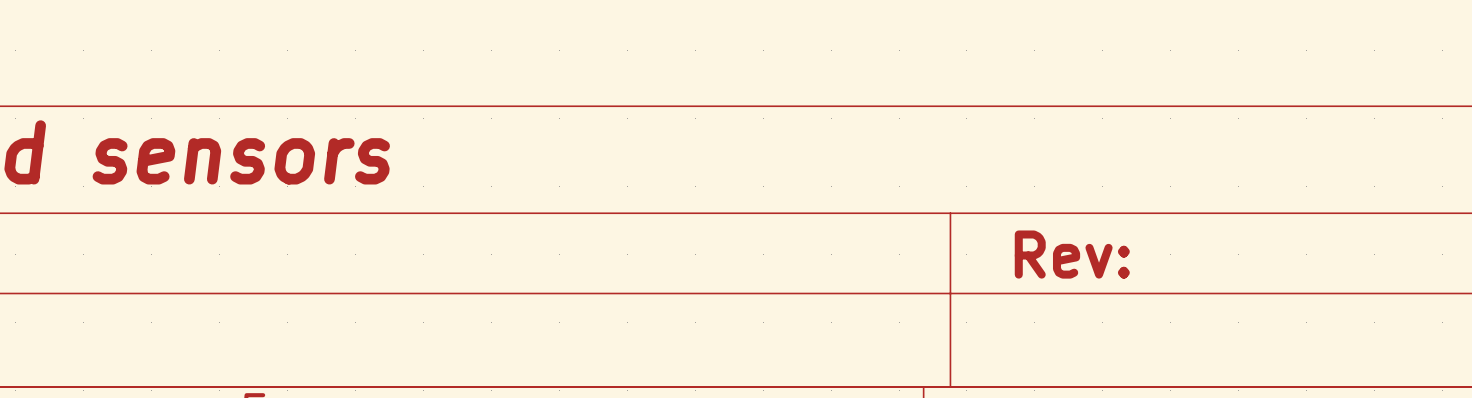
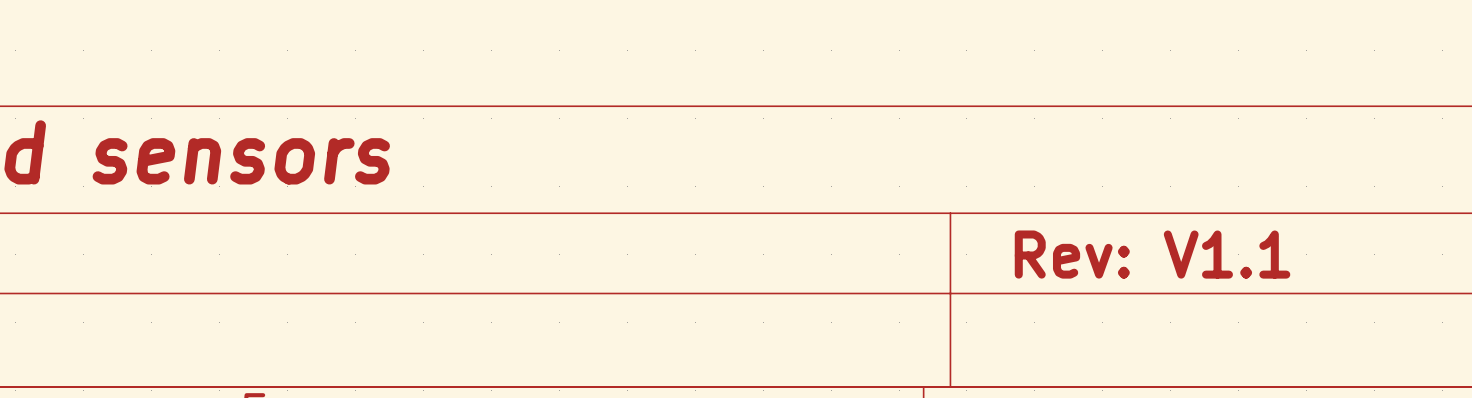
title block: Rev: (1072, 254) -> Rev: V1.1 (1152, 254)

